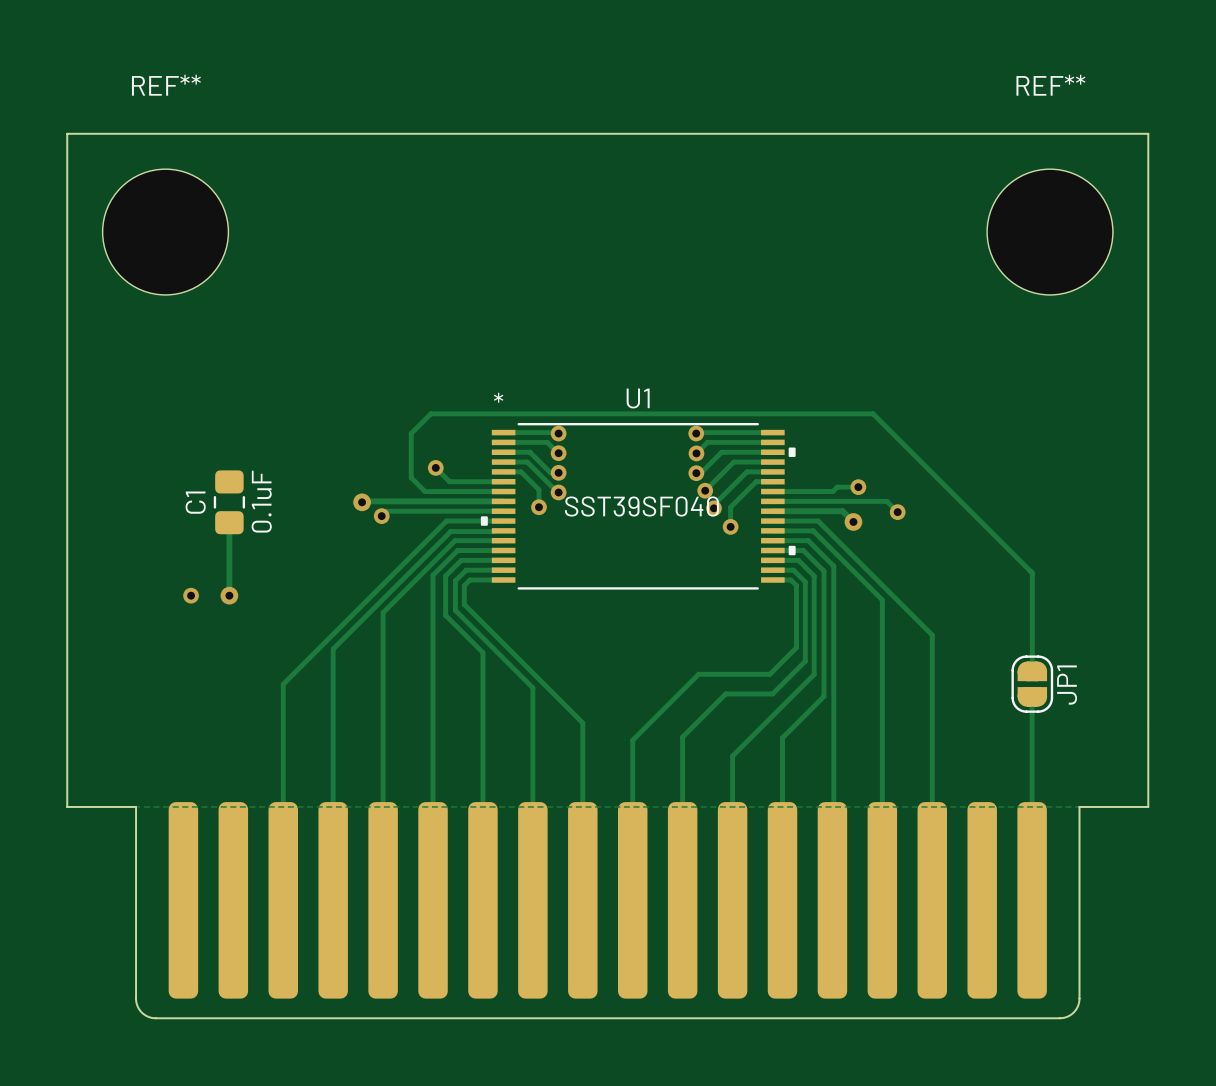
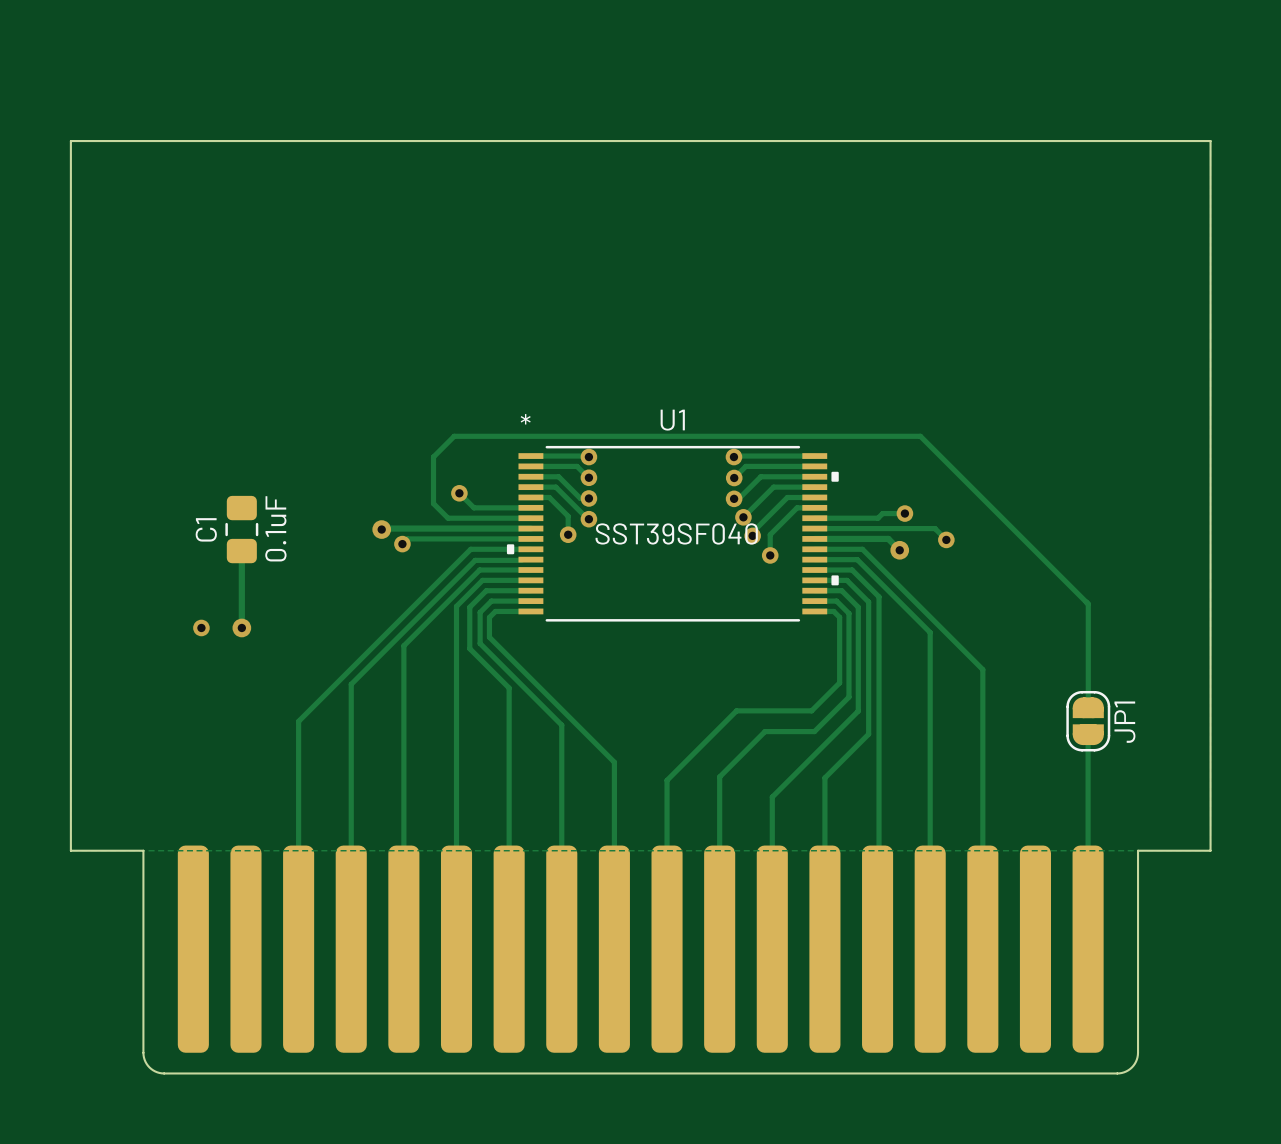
REF**: (165, 232) -> none
REF**: (1050, 232) -> none

